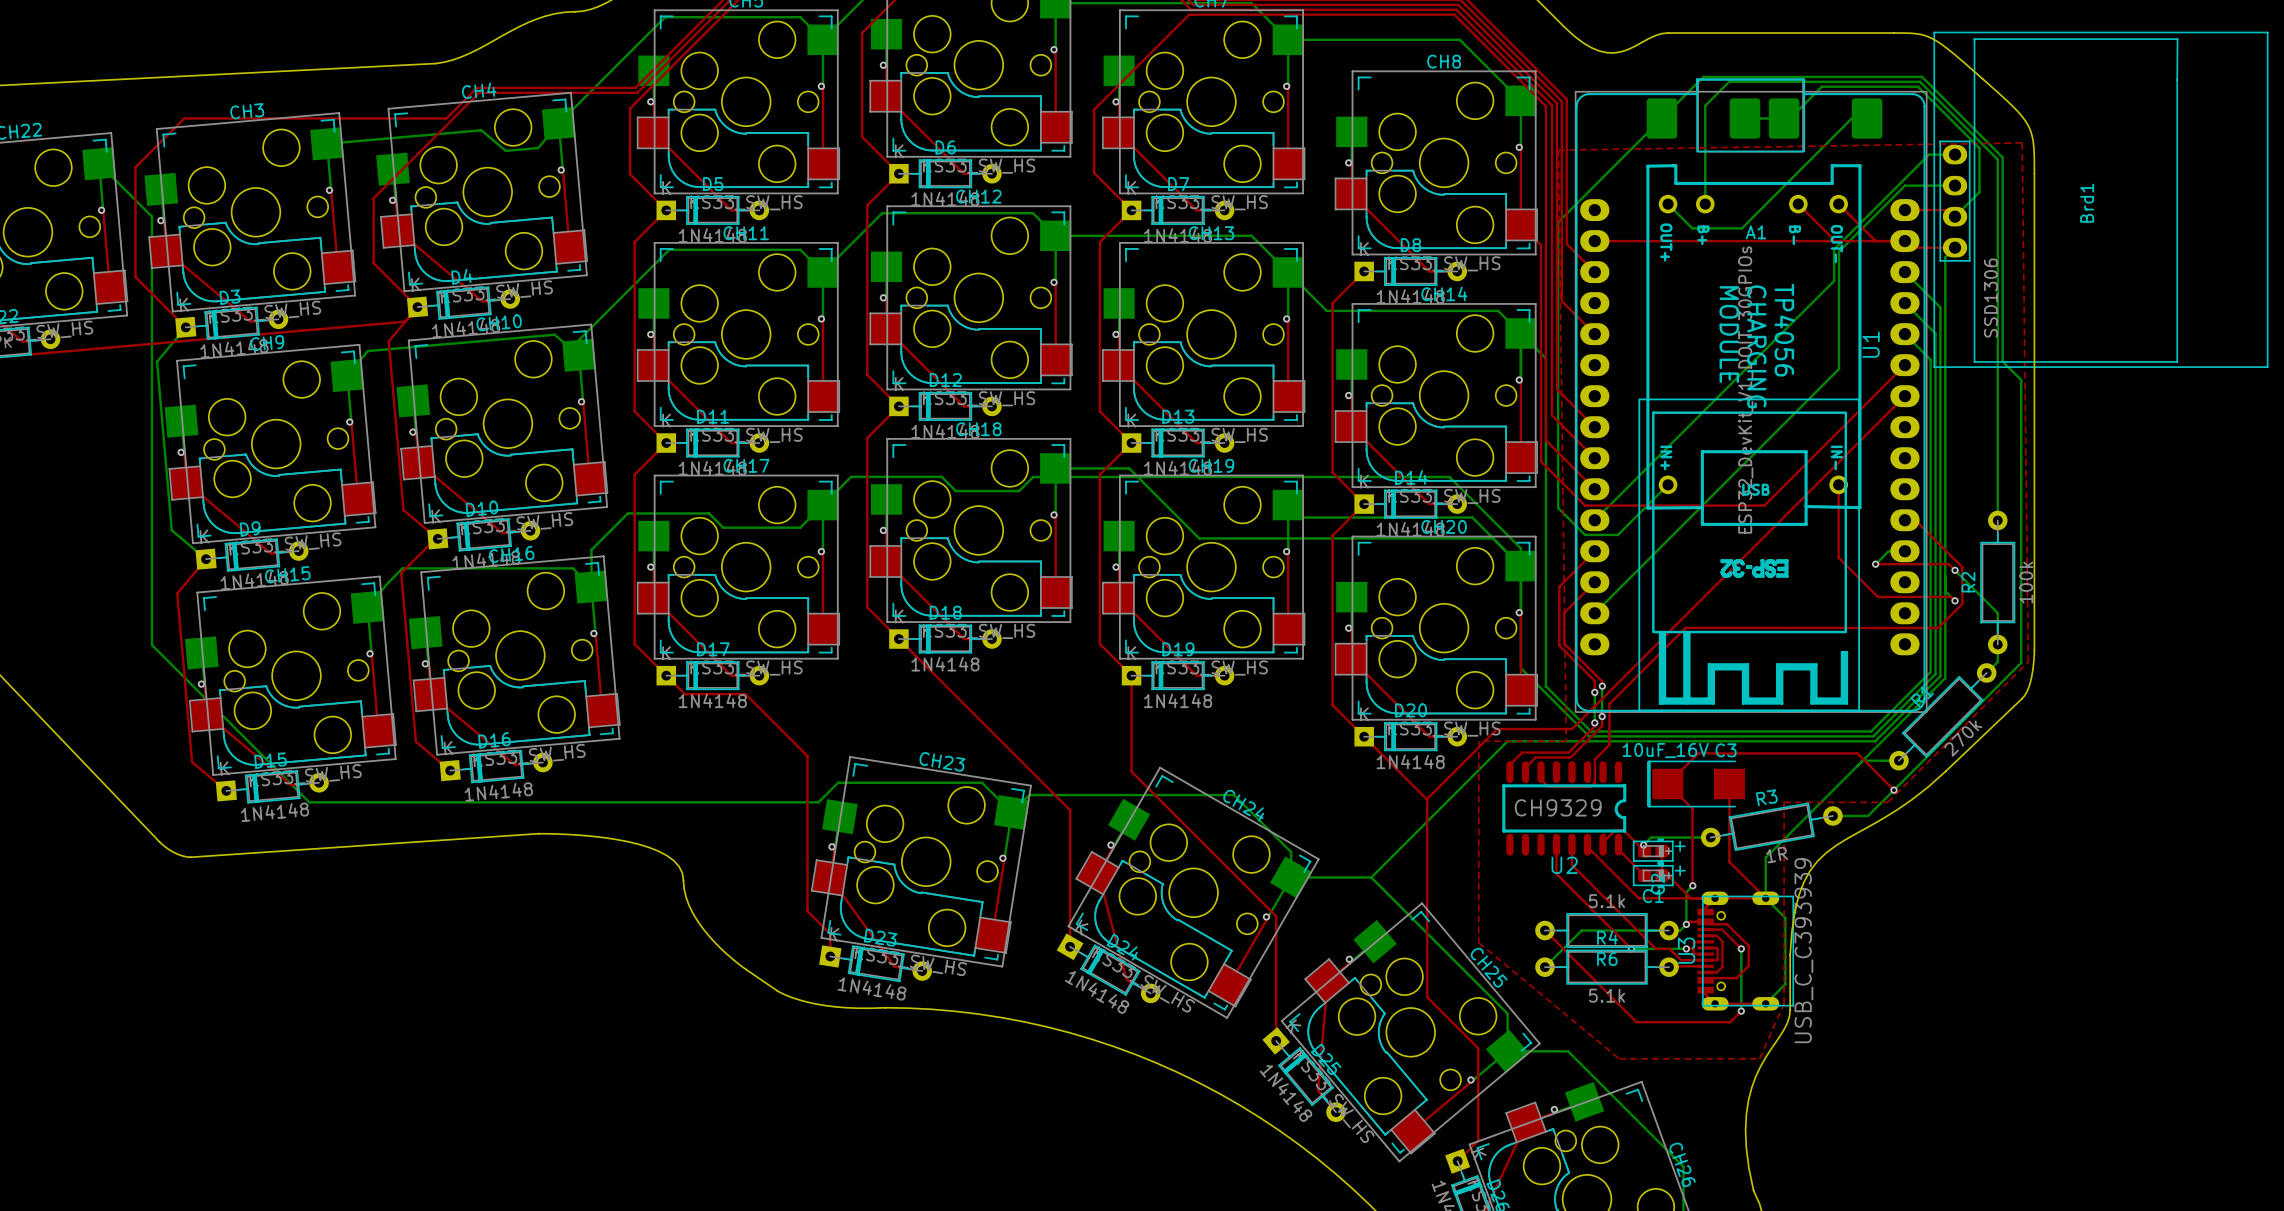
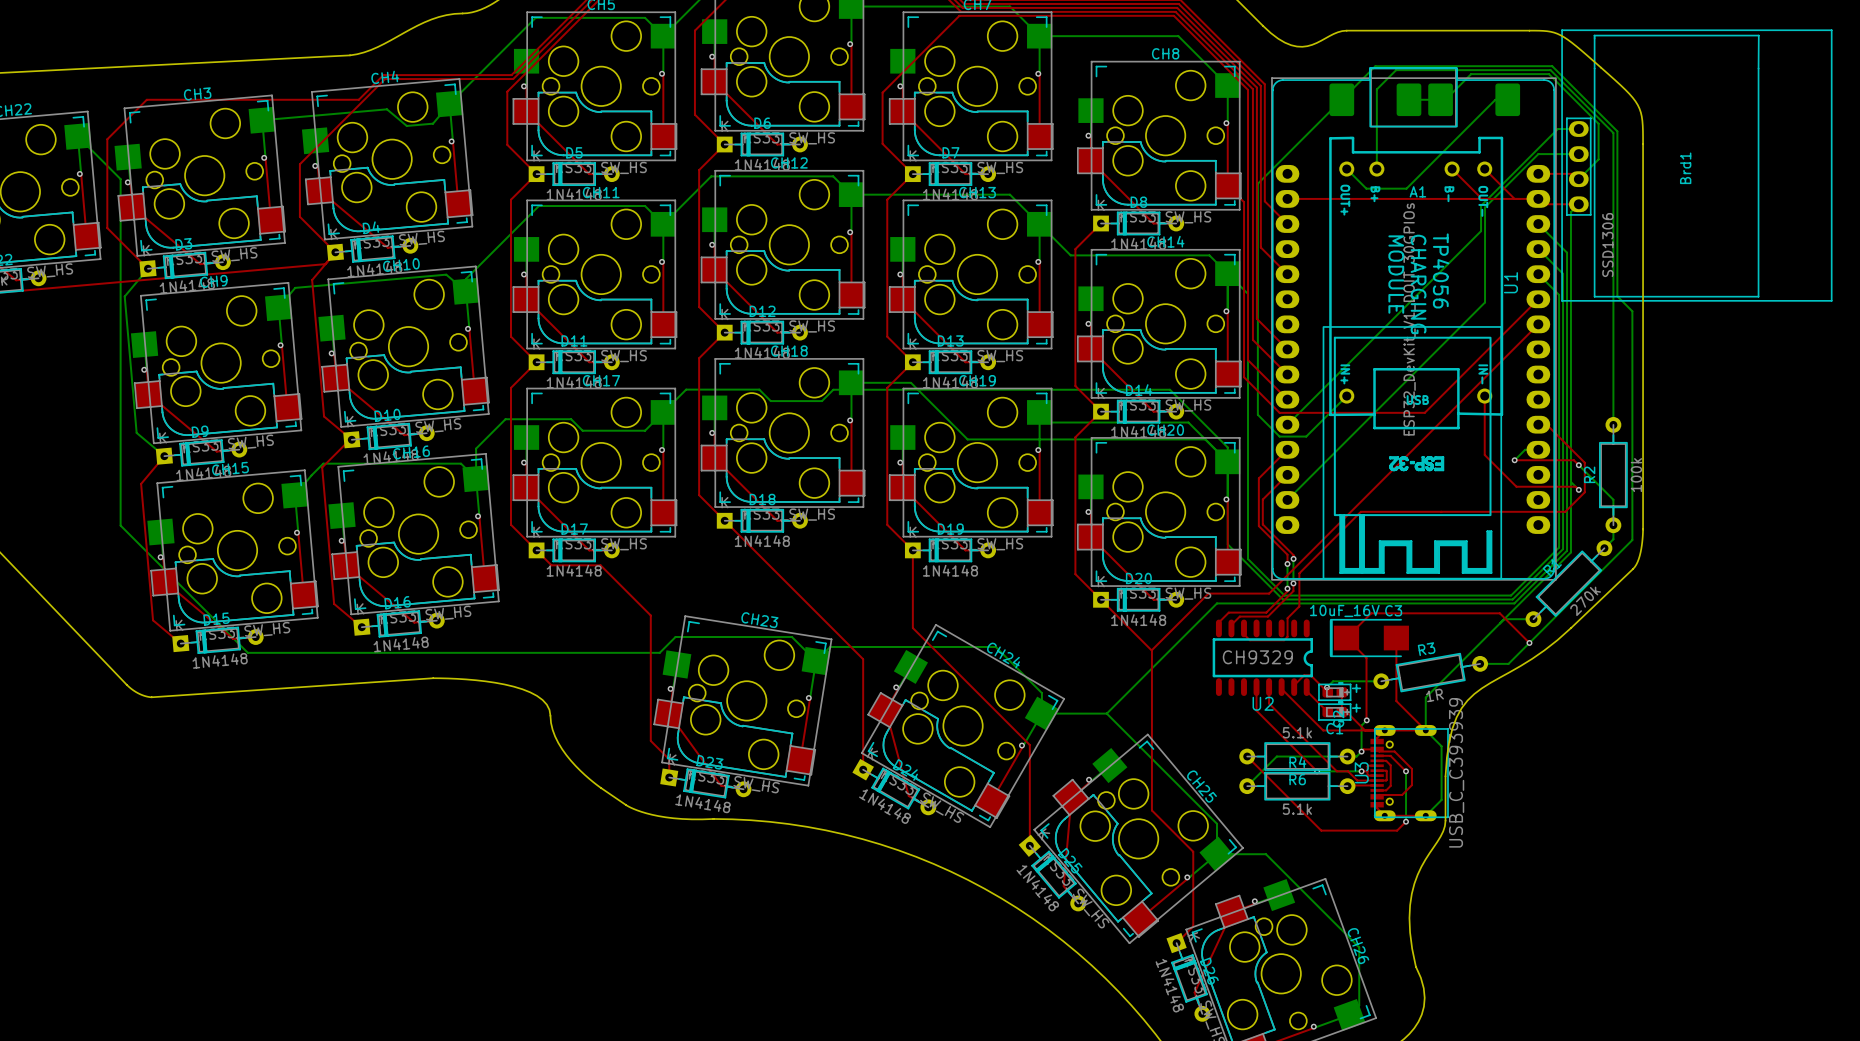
top zone outline: (2022, 142) (2028, 661) (1887, 802) (1784, 802) (1784, 1003) (1759, 1058) (1619, 1058) (1478, 942) (1478, 741) (1566, 741) (1558, 150) (2022, 142) -> none

